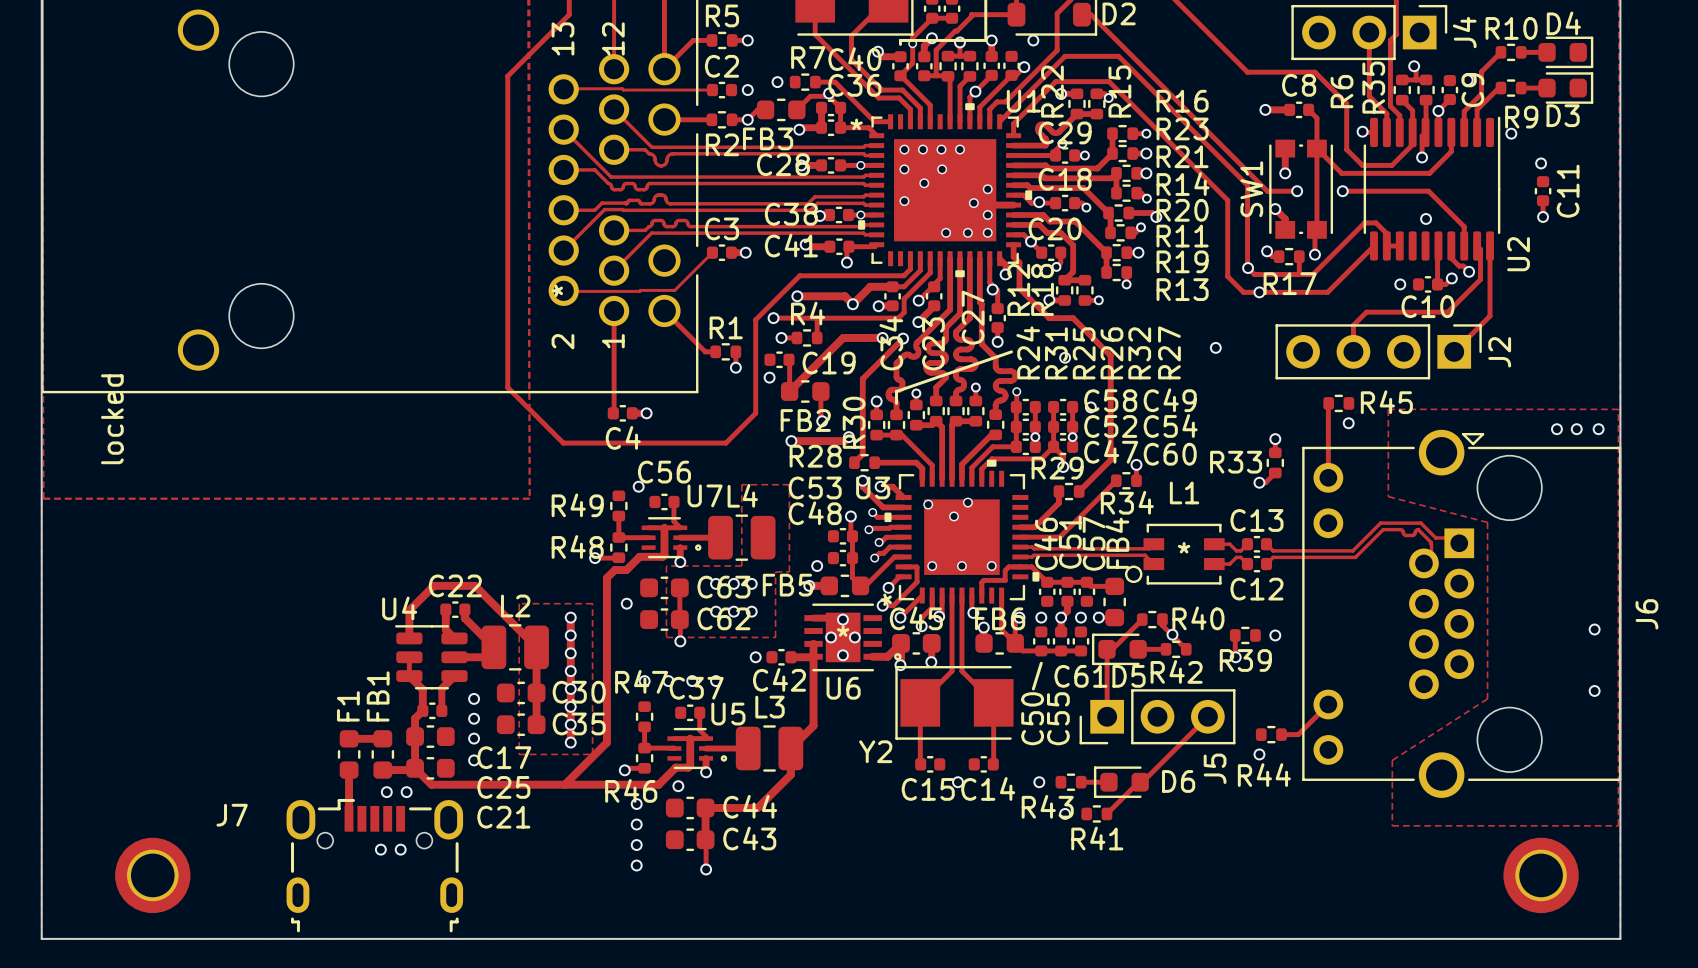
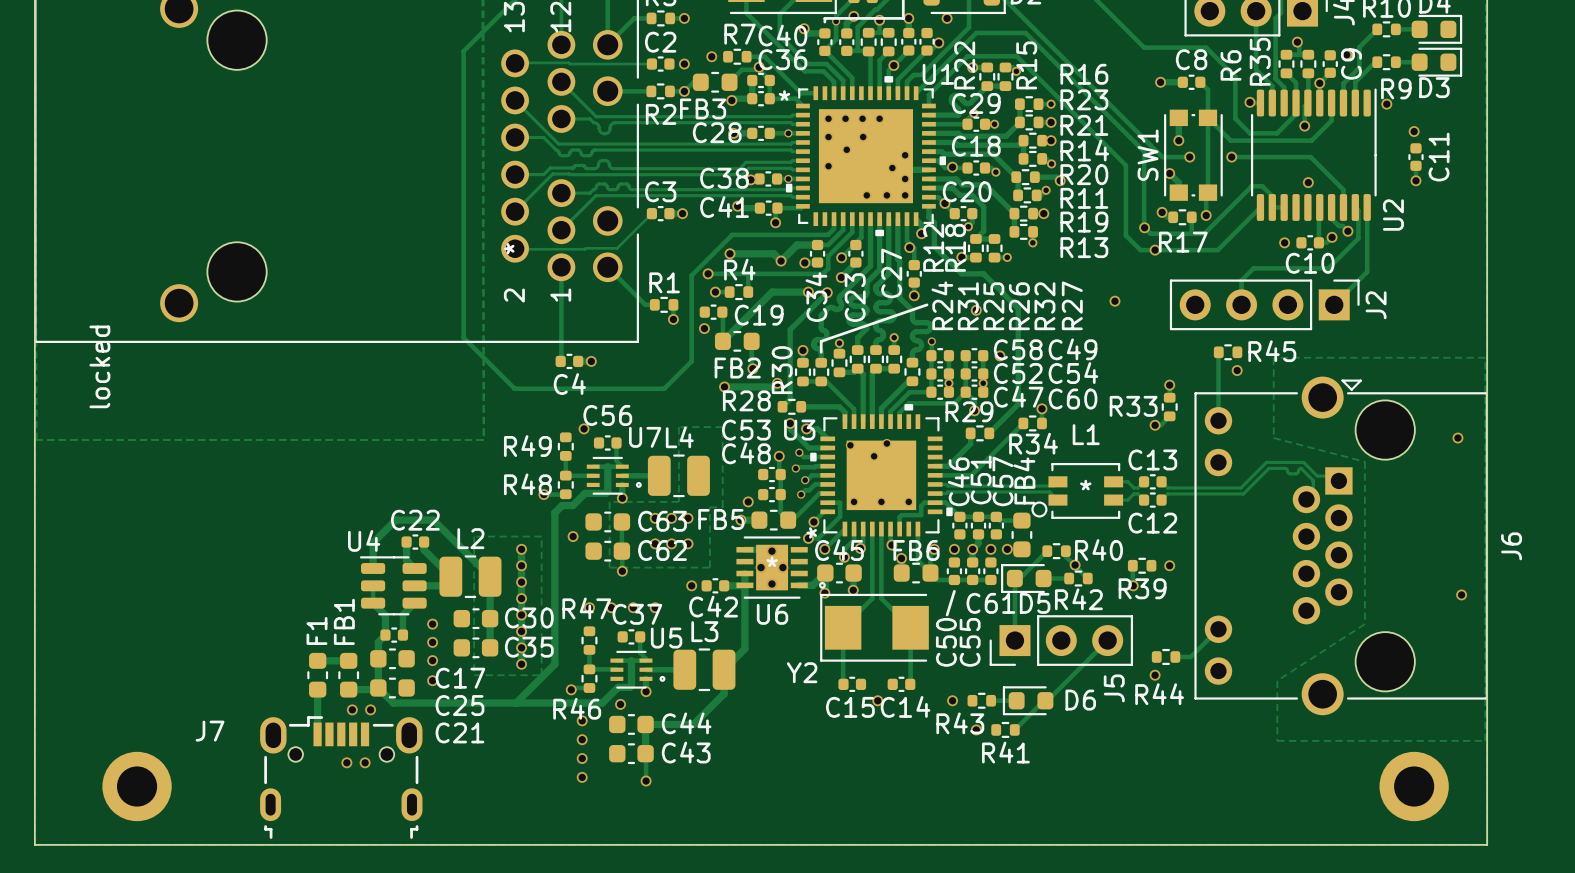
via: (1556, 429) -> none
via: (1576, 429) -> none
via: (1598, 429) -> none
via: none -> (1457, 438)
via: (1594, 629) -> none
via: none -> (1461, 594)
via: (1594, 690) -> none

